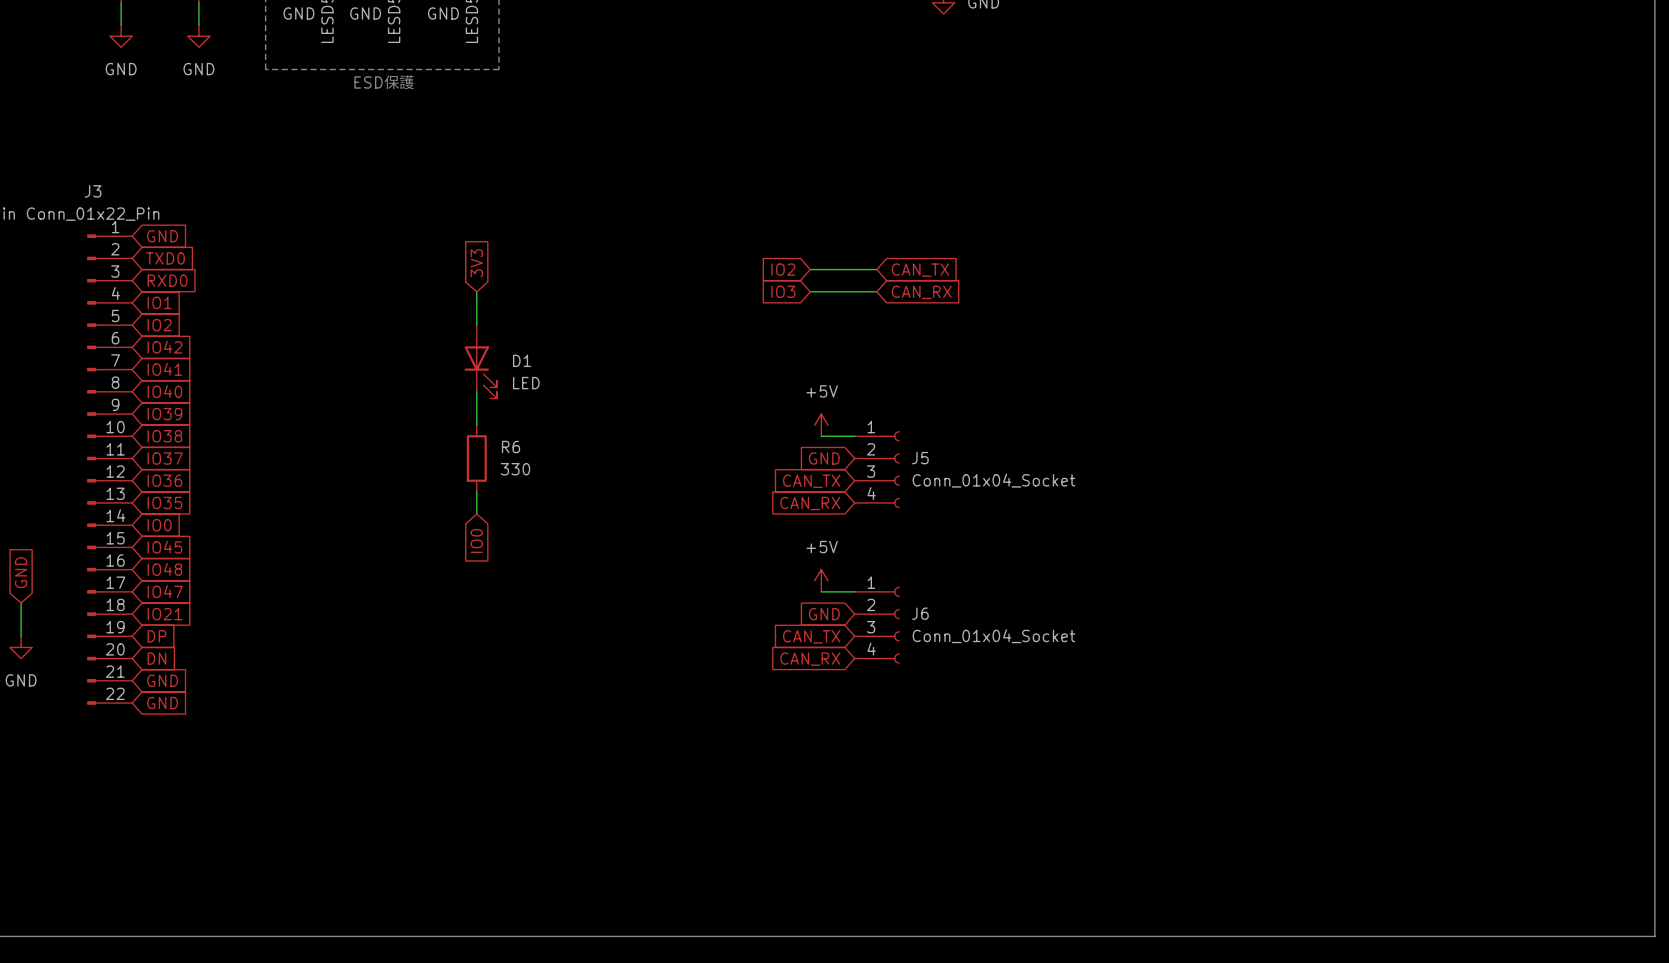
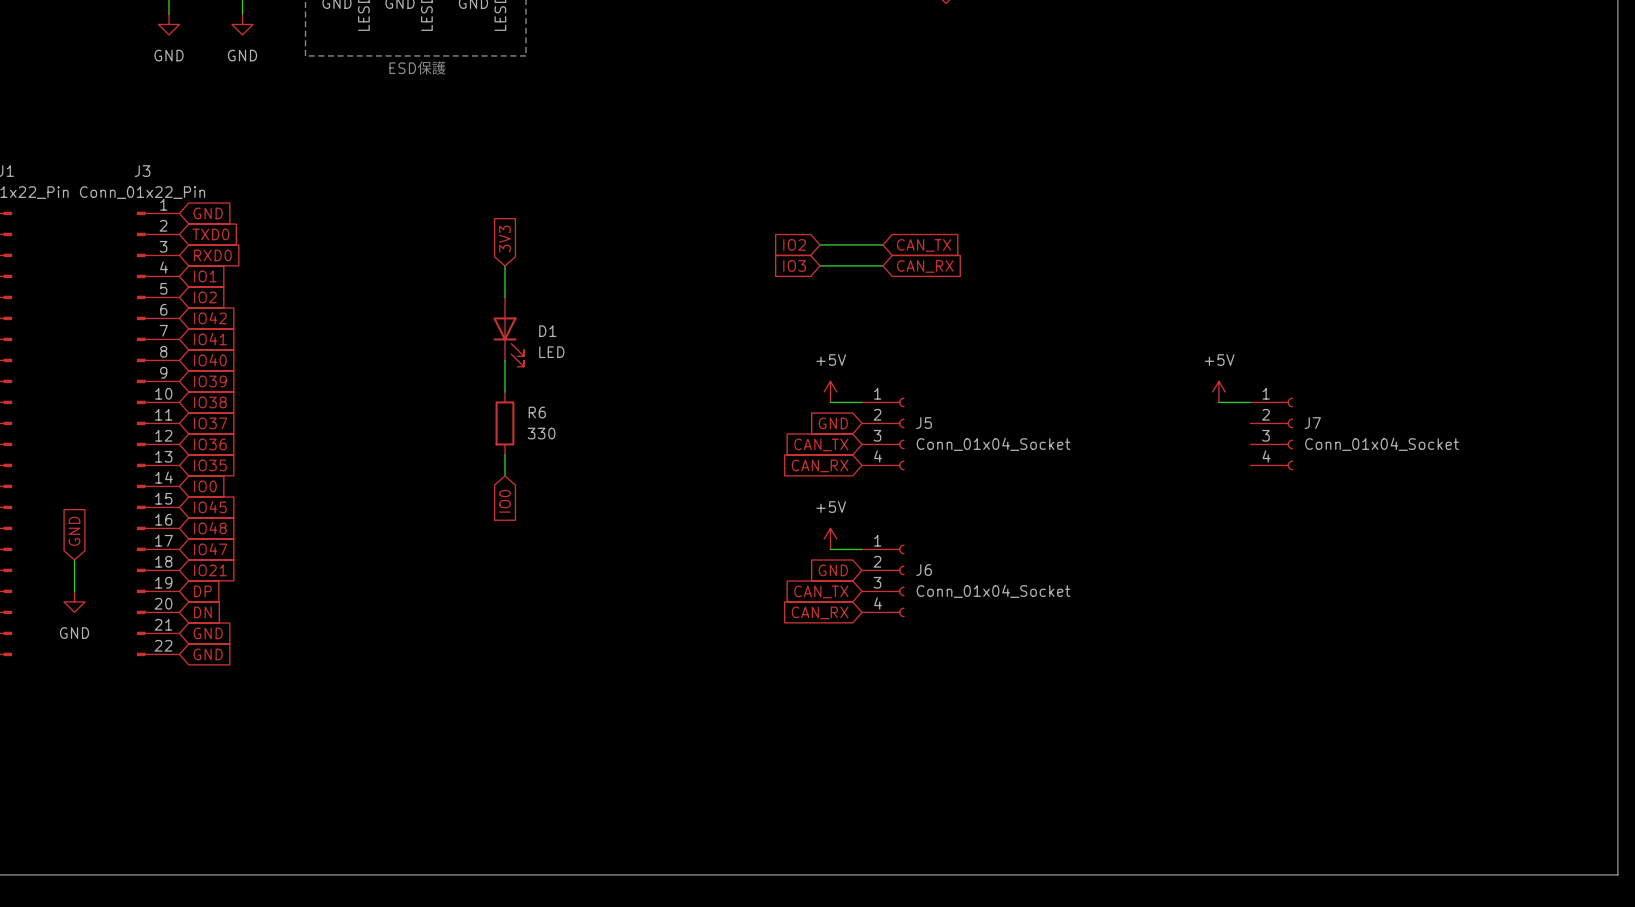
power symbol: none -> +5V (1218, 391)
wire: none -> (1218, 402) (1250, 402)
J7: none -> Conn_01x04_Socket (1271, 433)

